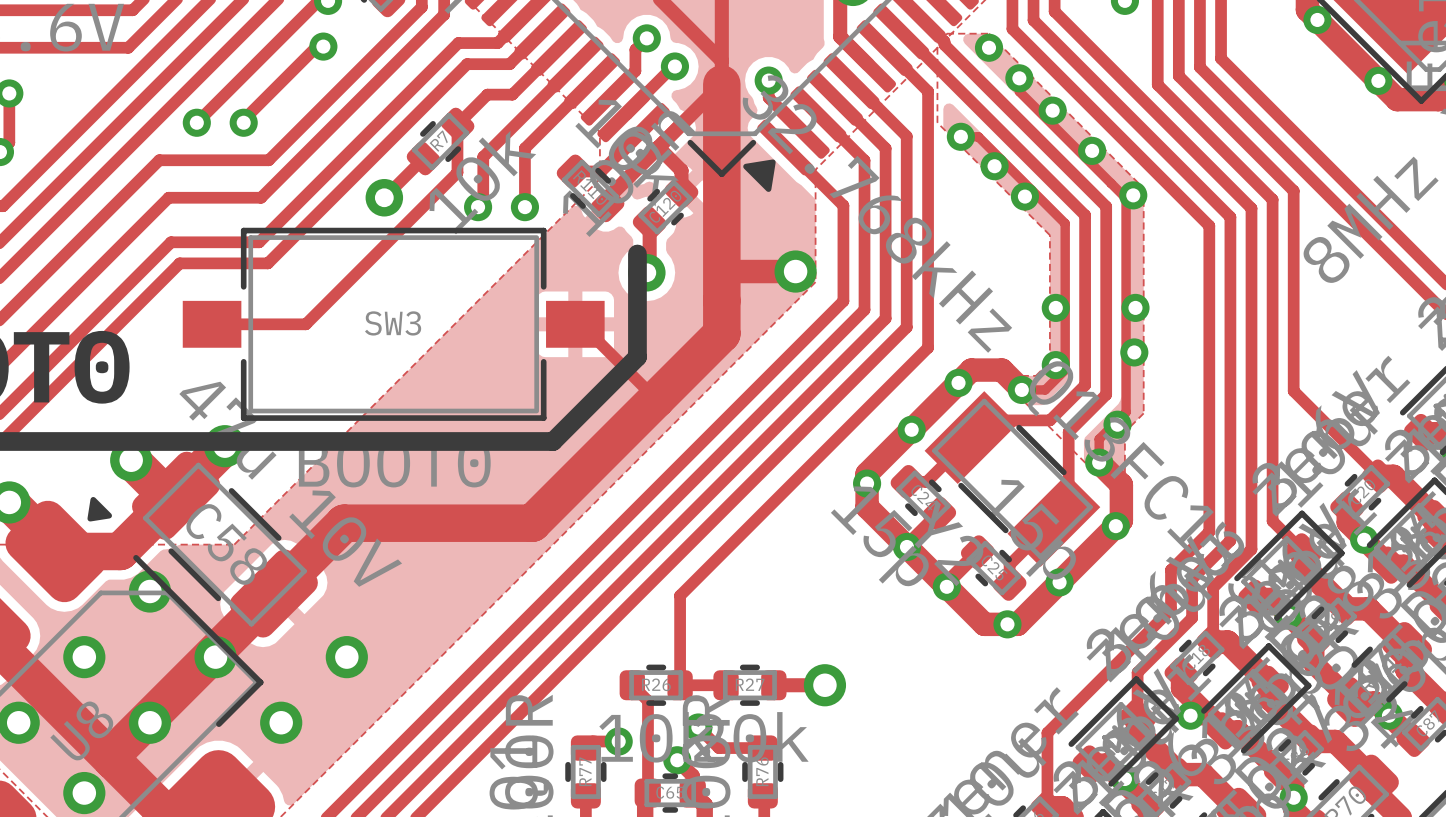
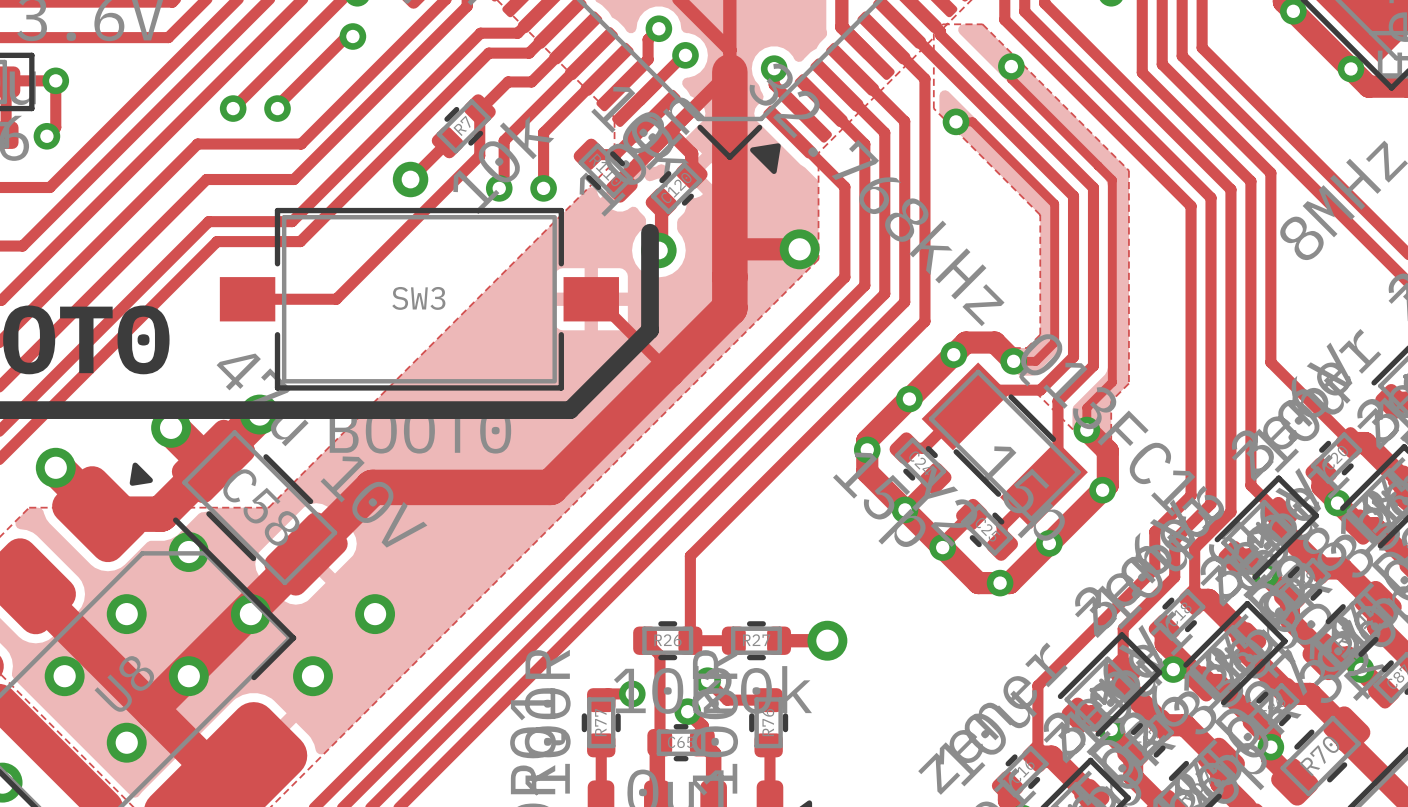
via: (989, 47) -> none
via: (1052, 110) -> none
via: (1092, 150) -> none
via: (994, 166) -> none
via: (1133, 195) -> none
via: (1024, 196) -> none
via: (1055, 307) -> none
via: (1135, 307) -> none
via: (1134, 352) -> none
via: (1055, 365) -> none
via: (1117, 424) -> none

